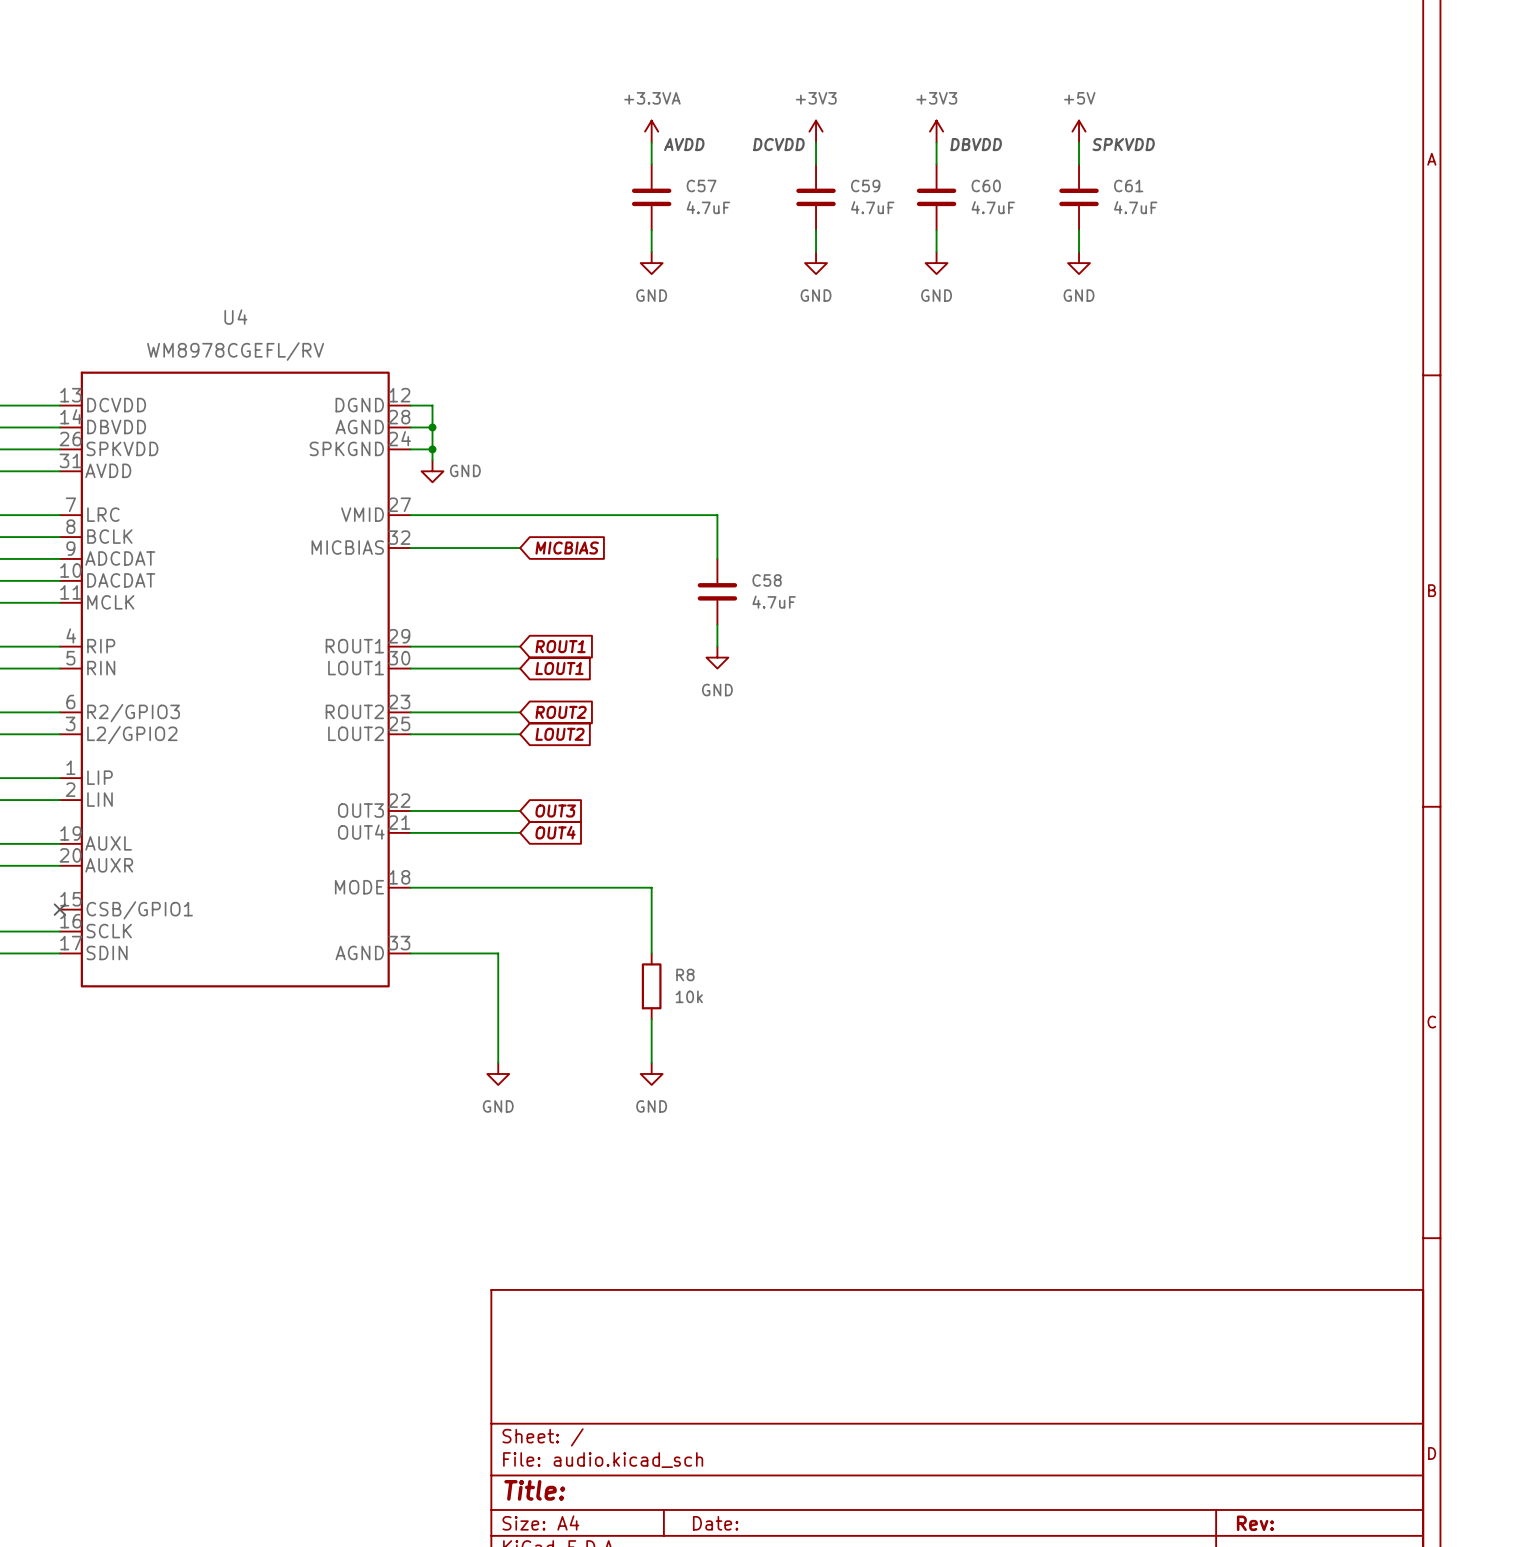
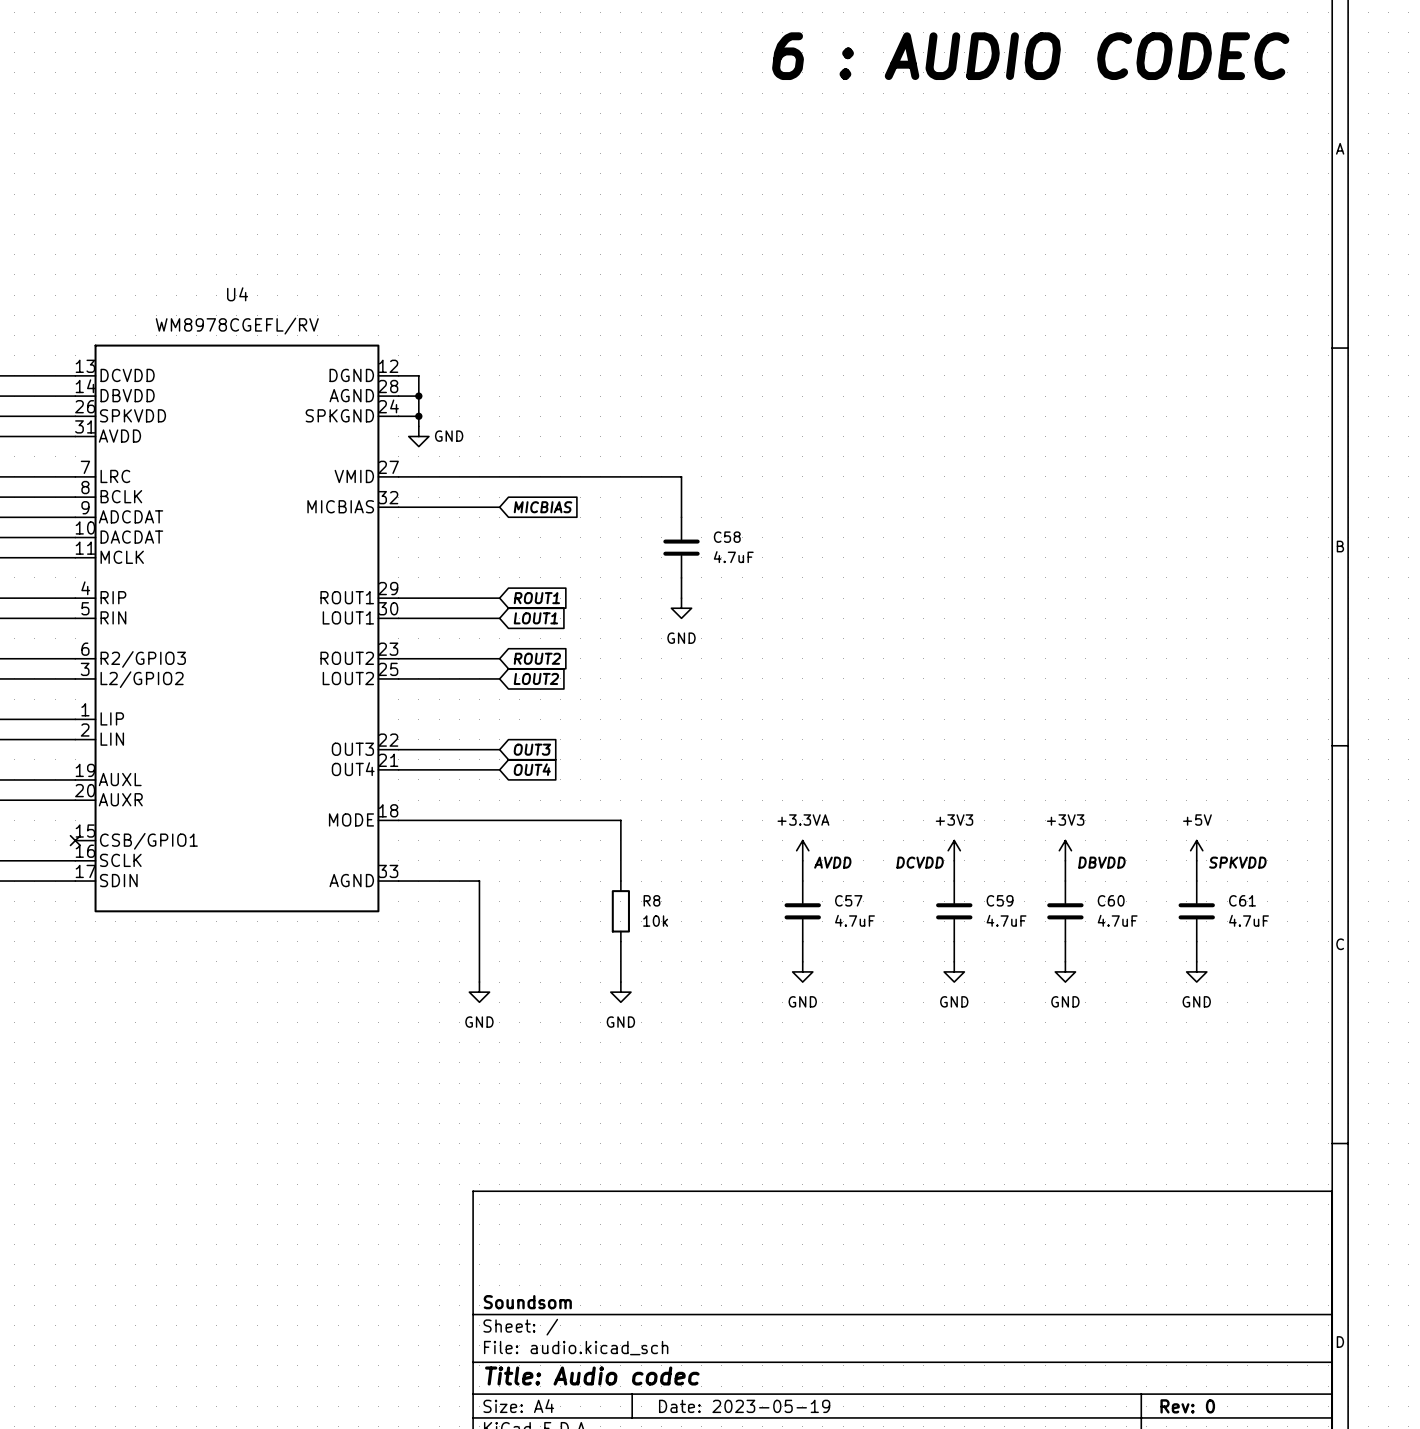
text: none -> 6 : AUDIO CODEC (1030, 56)
power symbol: +3.3VA (651, 131) -> none
power symbol: +3V3 (816, 131) -> none
power symbol: +3V3 (936, 131) -> none
power symbol: +5V (1079, 131) -> none
wire: (651, 142) (651, 164) -> none
wire: (816, 142) (816, 164) -> none
wire: (936, 142) (936, 164) -> none
wire: (1079, 142) (1079, 164) -> none
text: AVDD (684, 144) -> none
text: DCVDD (778, 144) -> none
text: DBVDD (976, 144) -> none
text: SPKVDD (1123, 144) -> none
C57 position: (651, 197) -> (802, 911)
C59 position: (816, 197) -> (954, 911)
C60 position: (936, 197) -> (1065, 911)
C61 position: (1079, 197) -> (1196, 911)
wire: (651, 230) (651, 252) -> none
wire: (816, 230) (816, 252) -> none
wire: (936, 230) (936, 252) -> none
wire: (1079, 230) (1079, 252) -> none
power symbol: GND (651, 263) -> none
power symbol: GND (816, 263) -> none
power symbol: GND (936, 263) -> none
power symbol: GND (1079, 263) -> none
power symbol: none -> +3.3VA (802, 850)
power symbol: none -> +3V3 (954, 850)
power symbol: none -> +3V3 (1065, 850)
power symbol: none -> +5V (1196, 850)
wire: none -> (802, 860) (802, 881)
wire: none -> (954, 860) (954, 881)
wire: none -> (1065, 860) (1065, 881)
wire: none -> (1196, 860) (1196, 881)
text: none -> AVDD (832, 862)
text: none -> DCVDD (920, 862)
text: none -> DBVDD (1101, 862)
text: none -> SPKVDD (1237, 862)
wire: none -> (802, 941) (802, 961)
wire: none -> (954, 941) (954, 961)
wire: none -> (1065, 941) (1065, 961)
wire: none -> (1196, 941) (1196, 961)
power symbol: none -> GND (802, 971)
power symbol: none -> GND (954, 971)
power symbol: none -> GND (1065, 971)
power symbol: none -> GND (1196, 971)
title block: none -> Soundsom (527, 1302)
title block: Title: (534, 1490) -> Title: Audio codec (592, 1376)
title block: Date: (715, 1523) -> Date: 2023-05-19 (744, 1406)
title block: Rev: (1255, 1523) -> Rev: 0 (1187, 1406)

